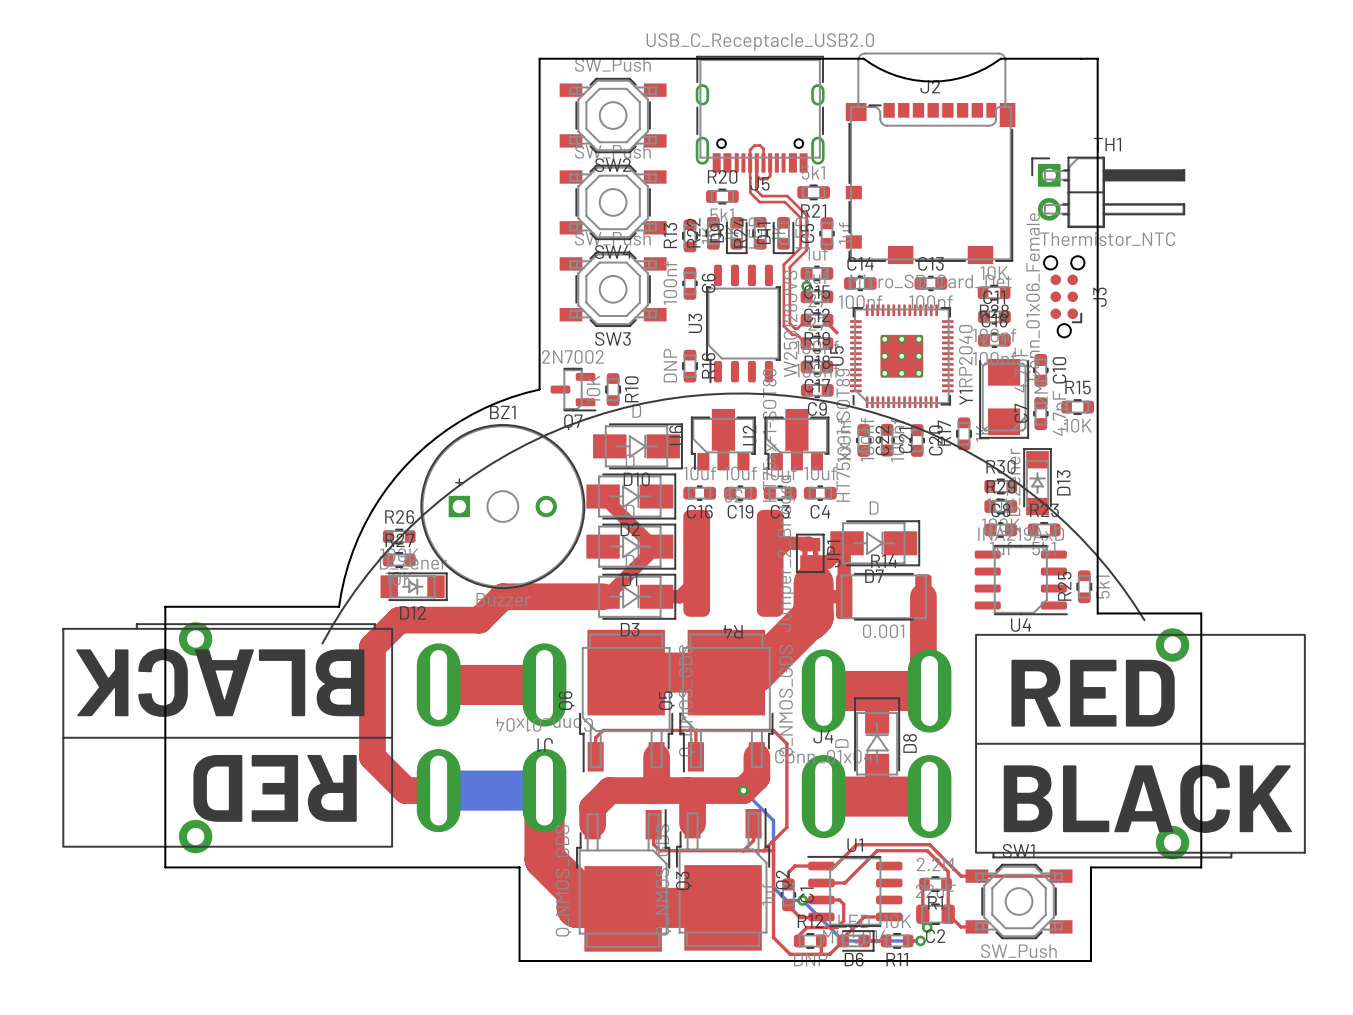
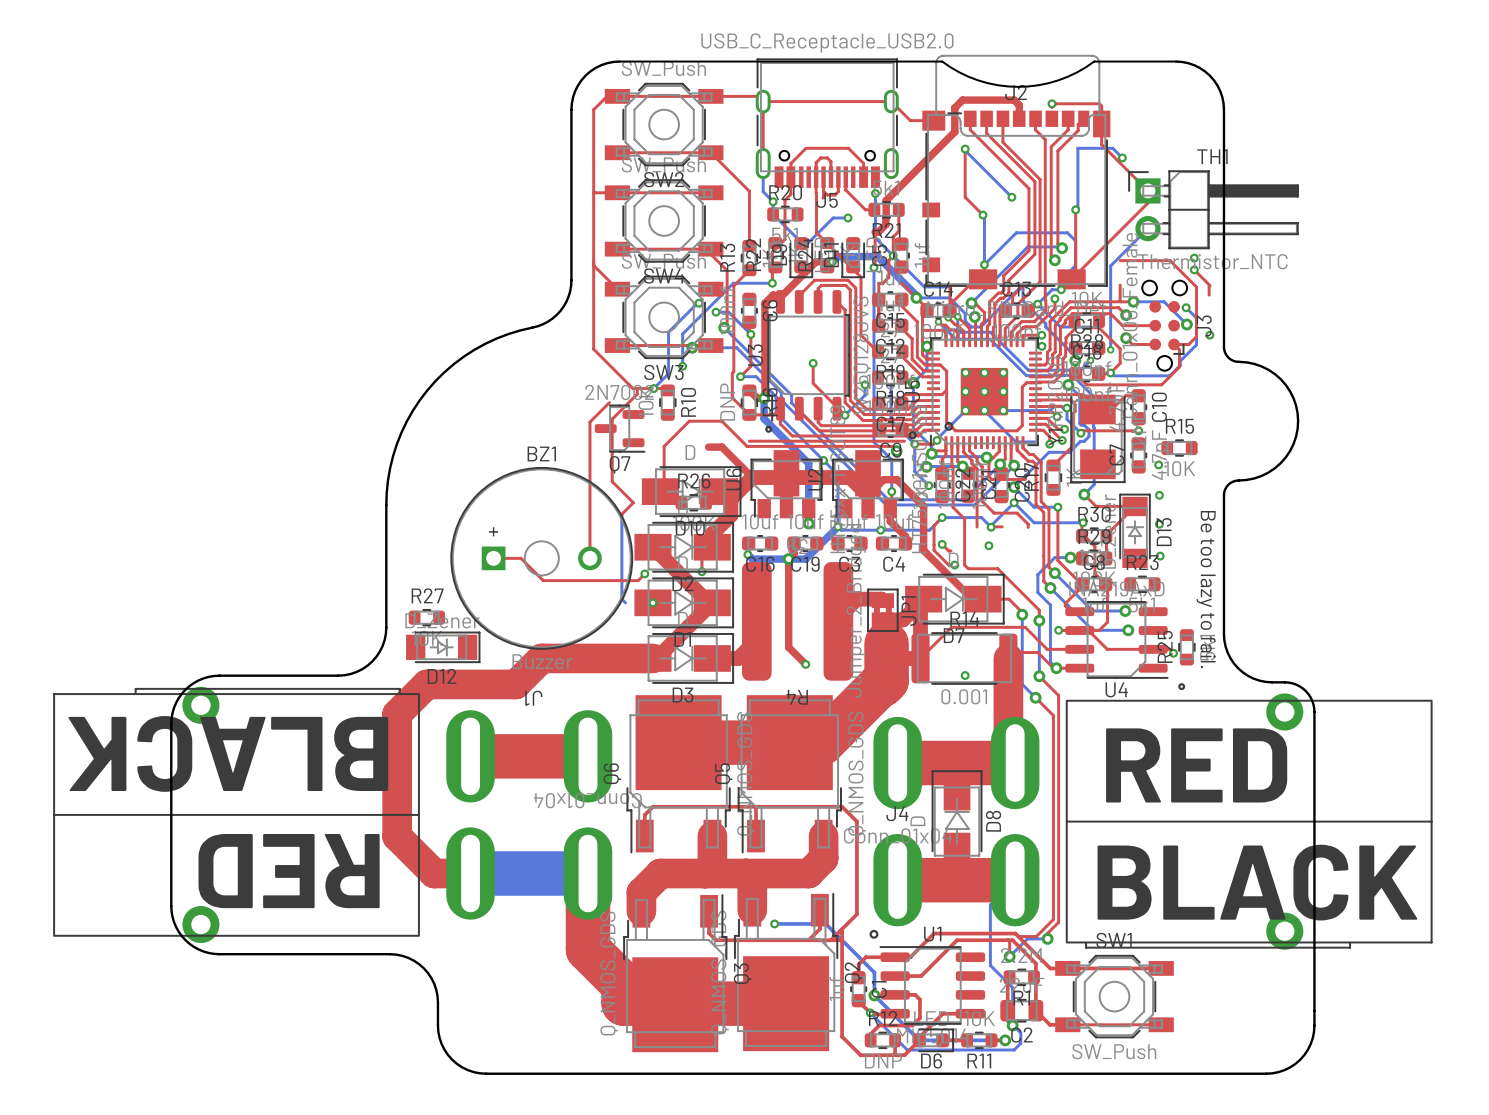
board edge: (573, 58) (539, 58) (539, 389) (498, 402) (460, 421) (425, 446) (405, 466) (378, 500) (364, 525) (348, 564) (339, 606) (165, 606) (165, 867) (519, 867) (519, 961) (1090, 961) (1090, 867) (1201, 867) (1201, 613) (1097, 613) (1097, 58) (1074, 58) -> (619, 61) (607, 63) (590, 71) (577, 85) (573, 97) (571, 109) (571, 280) (568, 296) (563, 306) (547, 321) (496, 338) (474, 349) (454, 363) (427, 390) (413, 410) (401, 432) (393, 455) (388, 480) (385, 633) (382, 645) (376, 656) (362, 669) (344, 675) (219, 675) (203, 678) (189, 686) (181, 693) (173, 707) (171, 718) (171, 905) (173, 921) (181, 936) (198, 949) (214, 953) (389, 954) (408, 957) (423, 968) (434, 983) (437, 996) (438, 1031) (444, 1049) (456, 1063) (467, 1070) (479, 1073) (1266, 1073) (1278, 1072) (1290, 1067) (1304, 1054) (1310, 1043) (1314, 1025) (1314, 708) (1308, 693) (1299, 686) (1288, 682) (1259, 680) (1242, 672) (1230, 658) (1225, 646) (1223, 634) (1224, 491) (1231, 482) (1261, 475) (1280, 463) (1293, 443) (1297, 428) (1297, 413) (1290, 391) (1274, 374) (1254, 363) (1233, 360) (1225, 352) (1223, 103) (1220, 91) (1209, 75) (1194, 65) (1175, 61)
top track: none -> (763, 101) (763, 163)
top track: none -> (763, 101) (758, 96) (607, 96) (593, 109) (593, 349) (632, 388) (665, 388) (667, 390)
top track: none -> (763, 101) (891, 101) (910, 120) (933, 120)
via: none -> (1051, 103)
top track: none -> (1051, 107) (1055, 103) (1099, 103) (1101, 106) (1101, 144) (1147, 190) (1147, 203) (1061, 289)
top track: none -> (970, 118) (970, 129) (1028, 188) (1028, 250) (1003, 275) (1003, 290) (989, 301) (987, 340)
top track: none -> (986, 118) (986, 133) (1034, 181) (1034, 254) (1008, 280) (1008, 292) (994, 303) (993, 340)
top track: none -> (1002, 118) (1002, 142) (1040, 179) (1040, 281) (1017, 304) (1017, 315) (1005, 328) (1005, 340)
top track: none -> (1019, 118) (1019, 105) (1014, 100) (962, 100) (954, 107) (954, 131) (886, 200) (885, 224) (878, 232) (875, 232) (873, 267)
top track: none -> (1035, 118) (1035, 129) (1045, 139) (1045, 310) (1034, 321) (1021, 321) (1011, 332) (1011, 340)
top track: none -> (1068, 118) (1068, 129) (1051, 146) (1051, 256) (1054, 260)
top track: none -> (1083, 118) (1078, 124) (1078, 130) (1057, 150) (1057, 243) (1062, 248)
top track: none -> (965, 149) (965, 197) (982, 215)
bottom track: none -> (965, 149) (1011, 197)
via: none -> (965, 149)
top track: none -> (617, 152) (710, 152) (749, 191) (749, 245)
bottom track: none -> (1122, 157) (1112, 148) (1077, 148) (1077, 207) (1075, 209)
via: none -> (1122, 157)
bottom track: none -> (763, 163) (763, 191) (773, 201) (773, 214) (805, 246) (833, 218) (848, 218)
top track: none -> (845, 177) (845, 190) (865, 209) (874, 209)
top track: none -> (863, 177) (863, 163) (848, 148) (806, 148) (790, 163) (790, 194) (784, 200) (784, 239) (772, 252) (772, 283)
top track: none -> (710, 192) (593, 193)
top track: (750, 177) (750, 192) (759, 202) (784, 202) (800, 217) (800, 247) (783, 264) (783, 326) (805, 343) -> none
top track: (756, 177) (756, 190) (762, 196) (787, 196) (806, 215) (806, 250) (789, 267) (789, 323) (797, 328) (805, 320) -> (816, 193) (816, 232) (861, 277) (861, 335) (878, 352)
bottom track: none -> (875, 193) (875, 238) (924, 286) (950, 286)
via: none -> (875, 193)
via: none -> (1011, 197)
via: none -> (773, 201)
top track: none -> (898, 209) (898, 231) (893, 236) (893, 255) (888, 260) (888, 277) (882, 283) (878, 283) (878, 299)
top track: none -> (1075, 209) (1075, 275)
via: none -> (1075, 209)
bottom track: none -> (982, 215) (984, 264) (1016, 232) (1067, 232) (1075, 240) (1075, 265) (1061, 279) (1061, 289) (1052, 289) (1037, 304) (1060, 327) (1091, 327)
via: none -> (982, 215)
via: none -> (848, 218)
bottom track: none -> (1147, 228) (1110, 265) (1110, 349)
bottom track: none -> (1062, 248) (1027, 246) (971, 303)
via: none -> (1062, 248)
top track: none -> (617, 249) (710, 249) (710, 254) (727, 270) (727, 324) (724, 327)
via: none -> (893, 255)
via: none -> (1194, 258)
via: none -> (1054, 260)
top track: none -> (1120, 260) (1170, 260) (1196, 287) (1196, 336) (1188, 344) (1174, 344) (1179, 349) (1179, 367) (1161, 384) (1086, 384) (1075, 373) (1075, 360)
top track: none -> (832, 261) (816, 261) (780, 297) (780, 301) (773, 295) (764, 303) (764, 397) (757, 398) (749, 390)
bottom track: none -> (832, 261) (837, 256) (877, 256) (916, 295) (916, 297) (949, 297) (965, 313) (965, 320) (971, 327) (980, 327) (1023, 284) (1023, 301) (1075, 356) (1075, 360)
via: none -> (832, 261)
top track: none -> (984, 264) (984, 277) (975, 279) (949, 304) (950, 286)
via: none -> (984, 264)
top track: none -> (593, 265) (617, 289)
bottom track: none -> (873, 267) (873, 442) (891, 459) (891, 491)
via: none -> (873, 267)
top track: none -> (749, 270) (733, 285) (732, 373) (732, 397) (749, 414) (774, 414) (780, 408) (780, 424) (792, 436) (918, 436)
top track: none -> (1194, 269) (1209, 285) (1209, 295)
via: none -> (1194, 269)
bottom track: none -> (772, 283) (733, 283) (682, 334) (682, 366)
via: none -> (772, 283)
top track: none -> (901, 283) (923, 304) (927, 304) (922, 309) (922, 354) (926, 359) (933, 359)
top track: none -> (1023, 284) (1012, 296) (1012, 303) (1000, 316) (999, 340)
top track: none -> (1120, 285) (1120, 301)
via: none -> (1061, 289)
via: none -> (916, 297)
top track: none -> (1054, 298) (1054, 308) (1036, 326) (1023, 327) (1017, 333) (1017, 340)
via: none -> (1054, 298)
top track: none -> (799, 301) (799, 295) (814, 280) (848, 280) (855, 288) (855, 398) (866, 409) (908, 409) (916, 400) (933, 400)
top track: none -> (818, 301) (818, 288) (821, 285) (845, 285) (850, 289) (850, 400) (864, 414) (910, 414) (918, 406) (933, 406)
top track: none -> (836, 301) (845, 310) (845, 402) (863, 420) (912, 419) (919, 412) (933, 412)
top track: none -> (1133, 301) (1069, 301) (1050, 321) (1050, 349) (1047, 352) (1047, 362) (1045, 364) (1035, 364)
bottom track: none -> (1133, 301) (1164, 301) (1186, 324)
via: none -> (1133, 301)
bottom track: none -> (698, 303) (668, 332) (668, 373) (653, 388)
via: none -> (698, 303)
top track: none -> (971, 303) (975, 303) (984, 312) (984, 321) (981, 324) (981, 340)
via: none -> (971, 303)
via: none -> (1037, 304)
top track: none -> (901, 306) (917, 321) (917, 357) (925, 364) (940, 364) (946, 371) (946, 421) (955, 430) (1017, 430) (1022, 425) (1022, 387) (1026, 382) (1053, 382) (1063, 372) (1066, 337) (1076, 327)
bottom track: none -> (1186, 307) (1196, 318) (1196, 344) (1180, 361) (1180, 365) (1169, 375) (1113, 375)
via: none -> (1186, 307)
bottom track: none -> (716, 312) (728, 312) (750, 334)
via: none -> (716, 312)
via: (806, 286) -> none
top track: none -> (1126, 315) (1118, 307) (1071, 307) (1055, 325) (1055, 351) (1052, 354) (1052, 365) (1047, 370) (1035, 370)
via: none -> (1126, 315)
top track: none -> (957, 316) (969, 328) (969, 340)
bottom track: none -> (957, 316) (957, 329) (960, 332) (990, 332) (1028, 370) (1080, 370) (1090, 360)
via: none -> (957, 316)
top track: none -> (974, 316) (975, 340)
via: none -> (974, 316)
top track: none -> (948, 317) (963, 331) (963, 340)
via: none -> (948, 317)
top track: none -> (749, 322) (750, 366) (740, 376)
top track: none -> (938, 321) (950, 329) (954, 329) (957, 332) (957, 340)
bottom track: none -> (938, 321) (955, 339) (989, 339) (1026, 375) (1072, 375) (1093, 396) (1094, 484) (1084, 494)
via: none -> (938, 321)
via: none -> (1186, 324)
top track: none -> (1155, 325) (1122, 325) (1110, 313) (1072, 313) (1060, 327) (1060, 354) (1057, 356) (1057, 370) (1051, 376) (1035, 376)
bottom track: none -> (724, 327) (791, 395) (791, 403) (888, 499) (964, 499) (1000, 464)
via: none -> (724, 327)
top track: none -> (1091, 327) (1099, 327) (1120, 348) (1120, 363) (1109, 373) (1098, 373)
top track: none -> (902, 329) (912, 338) (912, 359) (923, 370) (933, 370)
top track: none -> (922, 330) (943, 330) (945, 332) (945, 340)
via: none -> (750, 334)
top track: none -> (1041, 335) (1023, 335) (1023, 340)
via: none -> (1041, 335)
via: none -> (1209, 335)
top track: none -> (1126, 338) (1132, 344) (1155, 344)
via: none -> (1126, 338)
top track: none -> (617, 345) (690, 345) (692, 347) (694, 345) (710, 345)
bottom track: none -> (926, 346) (926, 369) (913, 382) (913, 428) (931, 446) (931, 453) (934, 456) (986, 457)
via: none -> (926, 346)
via: none -> (1041, 346)
bottom track: none -> (692, 347) (736, 347) (781, 392) (781, 399) (886, 504) (974, 504) (1014, 465)
via: none -> (692, 347)
via: none -> (1110, 349)
top track: (827, 323) (837, 332) -> (902, 355) (922, 376) (933, 376)
via: none -> (1075, 360)
via: none -> (1090, 360)
top track: none -> (813, 363) (813, 383) (845, 415)
via: none -> (813, 363)
via: none -> (682, 366)
via: none -> (1110, 372)
bottom track: none -> (740, 376) (756, 376) (776, 396) (776, 413) (838, 474) (838, 526)
via: none -> (740, 376)
via: none -> (913, 382)
bottom track: none -> (865, 384) (865, 395) (845, 415)
via: none -> (865, 384)
bottom track: none -> (1068, 385) (1079, 396) (1079, 423) (1089, 429) (1089, 436) (1084, 441) (1080, 441) (1069, 452) (1048, 452) (1014, 487) (1034, 507) (1057, 507)
via: none -> (1068, 385)
bottom track: none -> (891, 386) (891, 420) (914, 444) (914, 471) (928, 485)
top track: none -> (637, 388) (637, 394) (612, 419) (612, 481) (633, 502) (621, 514)
via: none -> (653, 388)
top track: none -> (946, 390) (942, 394) (905, 394) (901, 398)
top track: none -> (1035, 394) (1083, 394) (1097, 409) (1111, 409) (1125, 395) (1138, 395)
bottom track: none -> (764, 398) (764, 418) (808, 463) (808, 523)
via: none -> (764, 398)
top track: none -> (1035, 400) (1070, 399) (1075, 404) (1075, 411) (1072, 413) (1072, 446) (1053, 465)
top track: none -> (609, 402) (589, 422) (589, 558)
top track: none -> (1035, 406) (1054, 406)
top track: none -> (1054, 406) (1061, 406)
top track: none -> (799, 408) (819, 430) (907, 430) (916, 430) (922, 424) (933, 424)
top track: none -> (818, 408) (818, 422) (821, 425) (905, 425) (914, 424) (921, 418) (933, 418)
via: none -> (1066, 408)
bottom track: none -> (965, 410) (937, 440)
bottom track: none -> (984, 410) (1015, 441) (1035, 441)
bottom track: none -> (1003, 410) (1050, 410) (1054, 406) (1061, 406) (1065, 410) (1066, 408) (1066, 419) (1080, 433)
top track: none -> (1035, 412) (1052, 412) (1057, 416)
via: none -> (845, 415)
via: none -> (1057, 416)
top track: none -> (1035, 418) (1047, 418) (1058, 429) (1064, 429)
drawing: none -> [944, 421, 954, 431]
top track: none -> (1035, 424) (1045, 424) (1062, 440)
drawing: none -> [765, 425, 773, 433]
R10 position: (613, 389) -> (667, 402)
via: none -> (1064, 429)
drawing: none -> [908, 431, 917, 440]
top track: none -> (933, 430) (924, 430) (918, 436)
top track: none -> (1035, 430) (1043, 430) (1049, 436) (1049, 444)
top track: none -> (1138, 430) (1083, 430) (1080, 433)
via: none -> (1138, 430)
via: none -> (1080, 433)
top track: none -> (749, 441) (904, 441)
top track: none -> (937, 440) (933, 444) (914, 444)
via: none -> (937, 440)
via: none -> (1062, 440)
top track: none -> (945, 442) (945, 455) (942, 459) (942, 473)
top track: none -> (951, 442) (953, 507) (964, 518) (964, 565) (968, 568) (997, 568) (1039, 610) (1039, 620)
top track: none -> (957, 442) (957, 461) (962, 466)
top track: none -> (963, 442) (963, 452) (977, 468) (977, 527)
top track: none -> (969, 442) (969, 450) (982, 466) (982, 501) (994, 513) (1017, 513) (1028, 524) (1028, 527)
top track: none -> (999, 442) (999, 451) (988, 461) (988, 476) (991, 479) (1025, 479)
top track: none -> (1005, 442) (1005, 459) (1000, 464)
top track: none -> (1011, 442) (1011, 462) (1014, 465)
top track: none -> (1017, 442) (1017, 450) (1028, 461) (1032, 461) (1035, 464) (1035, 504) (1043, 512) (1043, 581) (1050, 588)
top track: none -> (1023, 442) (1023, 447) (1041, 462) (1041, 501) (1048, 509) (1048, 567) (1054, 573)
via: none -> (914, 444)
via: none -> (1049, 444)
top track: none -> (708, 447) (721, 447) (752, 477)
top track: none -> (896, 451) (891, 446) (747, 446) (721, 421) (689, 421) (664, 446) (664, 496) (657, 502) (681, 502)
via: none -> (896, 451)
top track: none -> (945, 450) (934, 450) (931, 453)
via: none -> (931, 453)
via: none -> (986, 457)
via: none -> (823, 460)
via: none -> (1000, 464)
via: none -> (1014, 465)
via: none -> (1158, 464)
bottom track: none -> (962, 466) (926, 466)
via: none -> (962, 466)
via: none -> (926, 466)
top track: none -> (752, 477) (850, 477) (868, 495) (883, 479) (896, 479) (923, 506) (923, 550) (972, 599) (1008, 599) (1022, 614)
top track: none -> (752, 477) (730, 499) (730, 515) (712, 533) (712, 547) (701, 557) (701, 571)
via: none -> (928, 485)
via: none -> (1014, 487)
top track: none -> (891, 491) (890, 521) (905, 536) (905, 543)
via: none -> (891, 491)
top track: none -> (1084, 494) (1096, 506) (1135, 506) (1106, 535) (1106, 558)
via: none -> (1084, 494)
via: none -> (1159, 495)
via: none -> (1014, 502)
top track: none -> (1057, 507) (1057, 560) (1082, 584) (1065, 605) (1071, 611) (1079, 611)
via: none -> (1057, 507)
bottom track: none -> (621, 514) (621, 599) (625, 602)
top track: none -> (942, 517) (934, 525) (934, 550) (948, 565) (954, 565)
via: none -> (942, 517)
top track: none -> (1083, 522) (1081, 536) (1084, 536) (1094, 546) (1094, 573) (1107, 586) (1107, 622) (1099, 630) (1058, 630)
bottom track: none -> (1083, 522) (1034, 522) (1014, 502) (991, 527) (981, 517) (942, 517) (929, 530) (841, 530) (838, 526)
via: none -> (1083, 522)
via: none -> (808, 523)
via: none -> (1159, 524)
bottom track: none -> (838, 526) (805, 559) (752, 559) (747, 554)
via: none -> (838, 526)
via: none -> (991, 527)
top track: none -> (1002, 526) (991, 527)
via: none -> (880, 530)
top track: none -> (793, 543) (793, 553) (788, 559) (788, 647) (805, 664)
top track: none -> (942, 544) (951, 550)
via: none -> (942, 544)
via: none -> (988, 545)
via: none -> (747, 554)
via: none -> (1160, 556)
bottom track: none -> (1070, 557) (1054, 557) (1037, 574) (1037, 592) (1050, 605) (1050, 662) (1056, 668)
via: none -> (1070, 557)
top track: none -> (493, 558) (521, 558) (543, 580) (638, 580) (644, 573)
via: none -> (788, 559)
via: none -> (954, 565)
via: none -> (701, 571)
bottom track: none -> (1054, 573) (1092, 611) (1125, 611)
via: none -> (1054, 573)
via: none -> (644, 573)
bottom track: none -> (1050, 588) (1092, 630) (1128, 630)
via: none -> (1050, 588)
text: none -> Be too lazy to fail. (1206, 589)
R26 position: (399, 536) -> (693, 502)
via: none -> (653, 602)
via: none -> (1125, 611)
bottom track: none -> (1022, 614) (1022, 684) (1035, 697)
via: none -> (1022, 614)
bottom track: none -> (1039, 620) (1039, 676)
via: none -> (1039, 620)
via: none -> (1058, 630)
top track: none -> (1088, 630) (1107, 649) (1169, 649) (1173, 653)
via: none -> (1128, 630)
top track: none -> (1079, 649) (1047, 649) (1025, 627) (951, 627) (920, 658)
via: none -> (1173, 653)
top track: none -> (1008, 658) (1014, 652) (1037, 652) (1053, 668) (1079, 668)
via: none -> (805, 664)
via: none -> (1056, 668)
via: none -> (965, 675)
top track: none -> (1039, 676) (1058, 695) (1058, 922) (1047, 933) (1047, 938)
via: none -> (1039, 676)
drawing: none -> [1178, 683, 1186, 691]
line: (1144, 620) (1108, 569) (1066, 523) (1018, 483) (965, 450) (909, 424) (850, 406) (788, 395) (726, 393) (664, 399) (604, 413) (545, 435) (490, 464) (440, 500) (394, 542) (355, 590) (322, 643) -> none
top track: none -> (1035, 697) (1053, 715) (1053, 919) (1036, 936) (1018, 936) (1015, 933)
via: none -> (1035, 697)
J1 name position: J1 (545, 744) -> J1 (533, 698)
bottom track: (743, 790) (773, 820) (773, 887) (786, 900) (802, 900) -> (774, 923) (825, 923) (874, 972) (874, 995)
via: (743, 790) -> none
bottom track: none -> (1015, 880) (990, 904) (990, 965) (1012, 987) (1012, 1025) (1020, 1032) (1020, 1043) (1014, 1049) (907, 1049) (870, 1012)
via: none -> (774, 923)
drawing: none -> [869, 929, 879, 939]
bottom track: none -> (1047, 938) (1027, 938) (1009, 956)
via: none -> (1047, 938)
top track: none -> (1008, 940) (1009, 956)
via: none -> (1009, 956)
via: none -> (870, 1012)
top track: none -> (1067, 1024) (1161, 1024)

